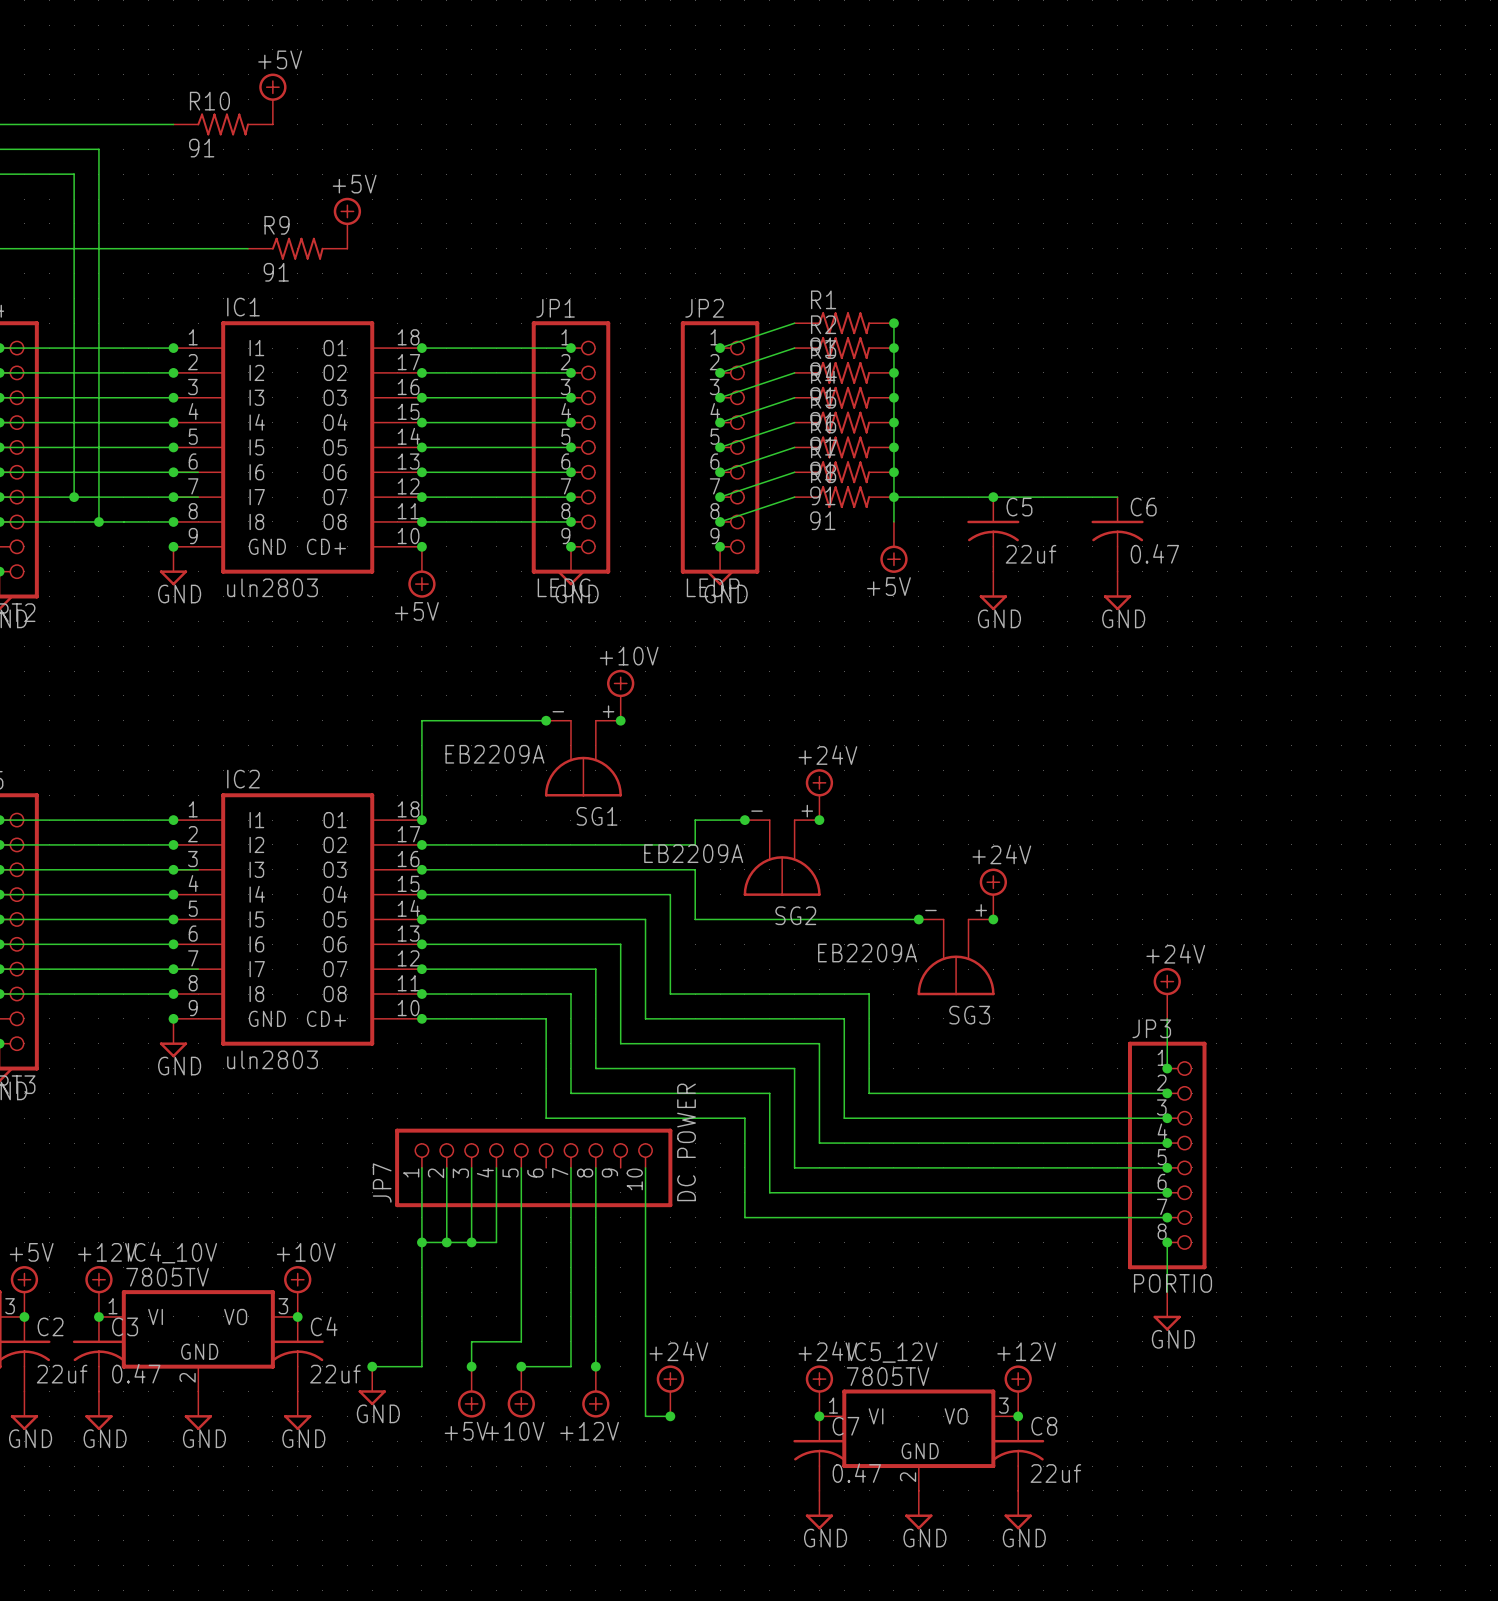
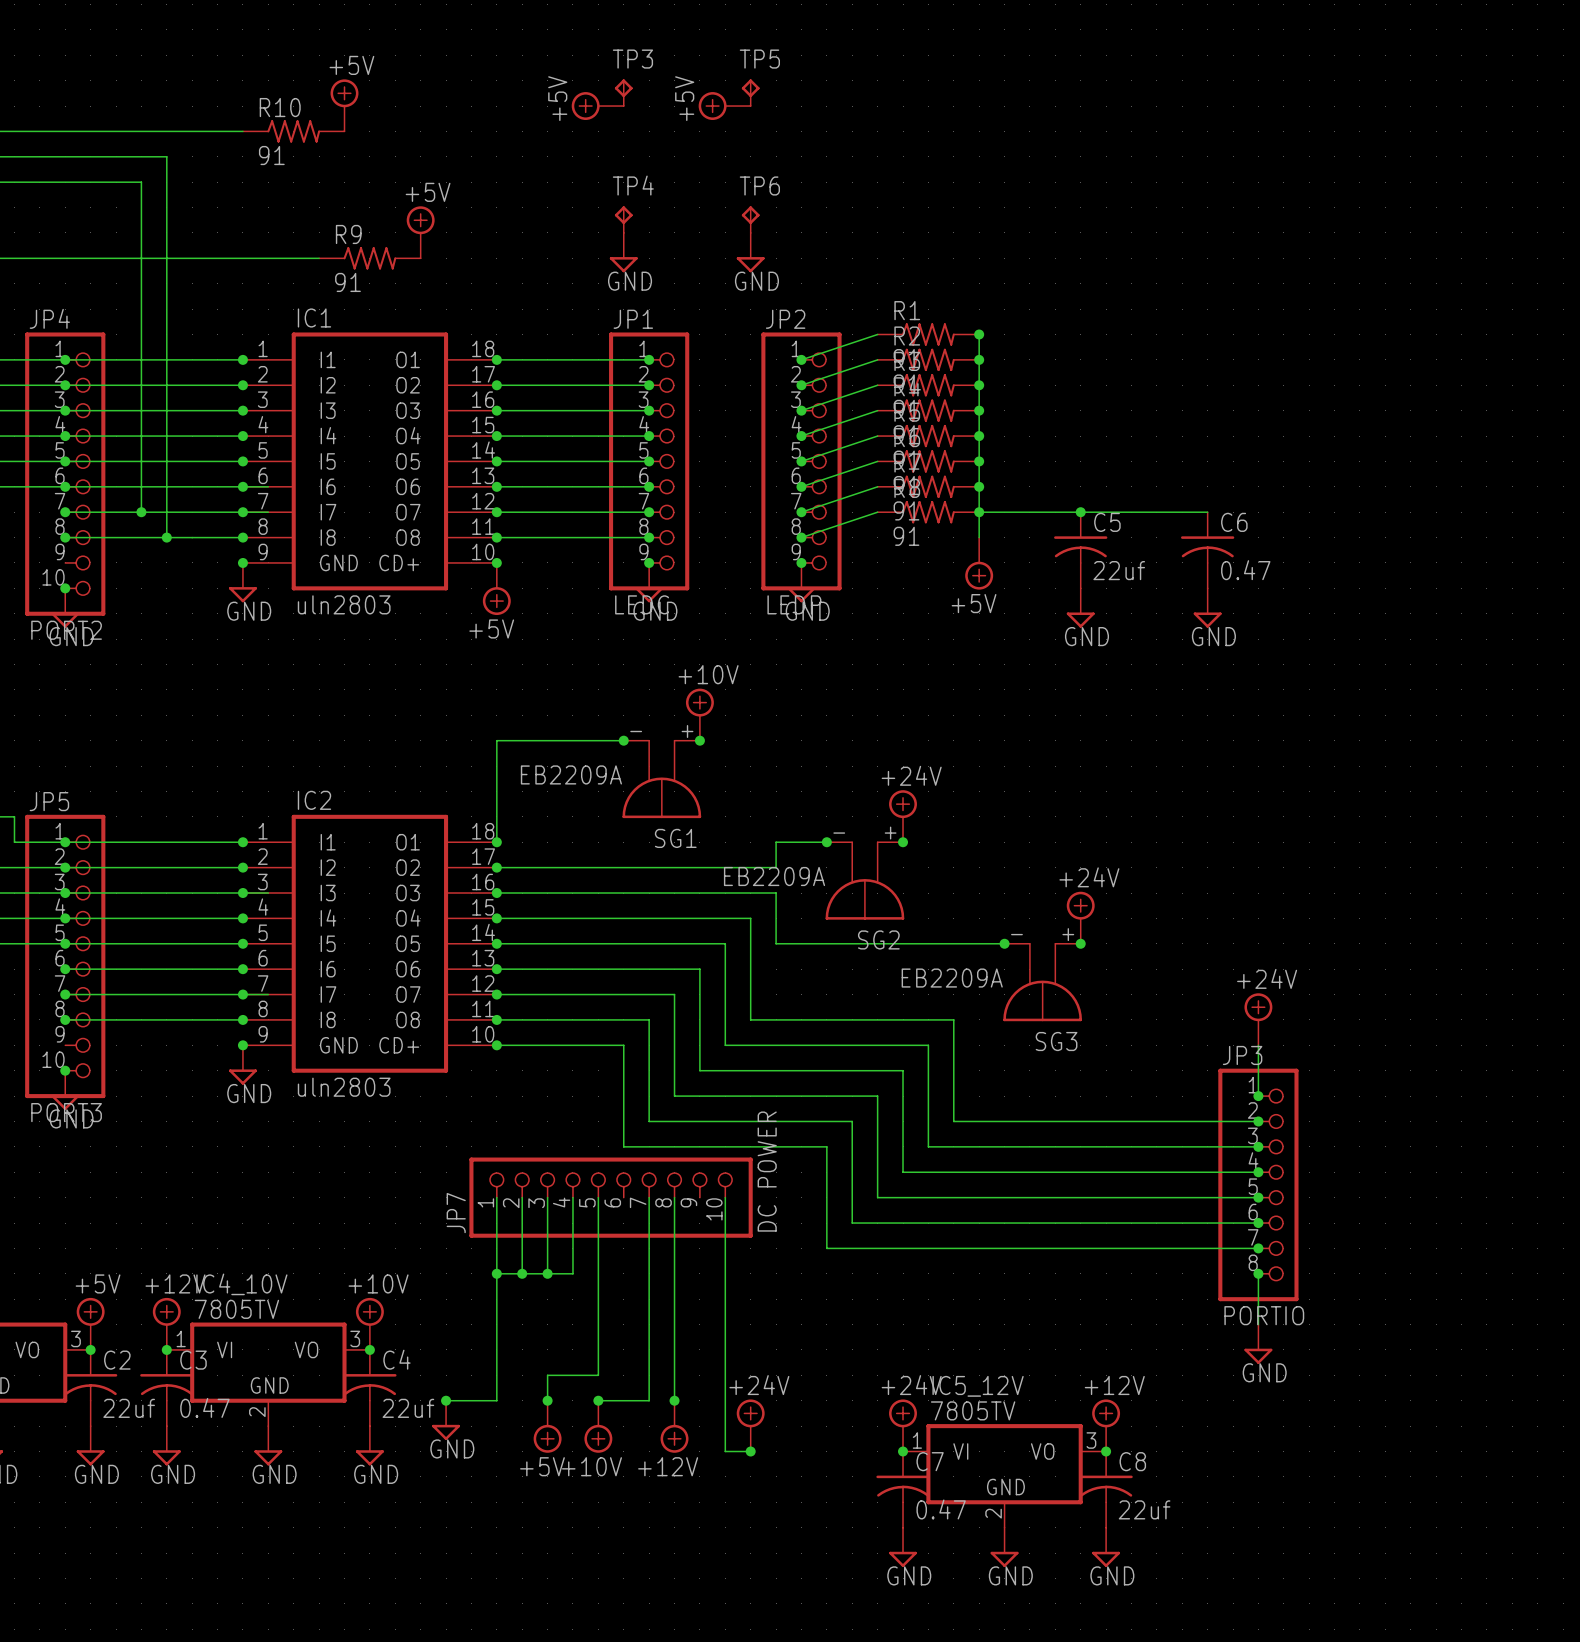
TP3: none -> (623, 92)
TP5: none -> (750, 92)
power symbol: none -> +5V (597, 106)
power symbol: none -> +5V (724, 106)
TP4: none -> (623, 219)
TP6: none -> (750, 219)
power symbol: none -> GND (623, 252)
power symbol: none -> GND (750, 252)

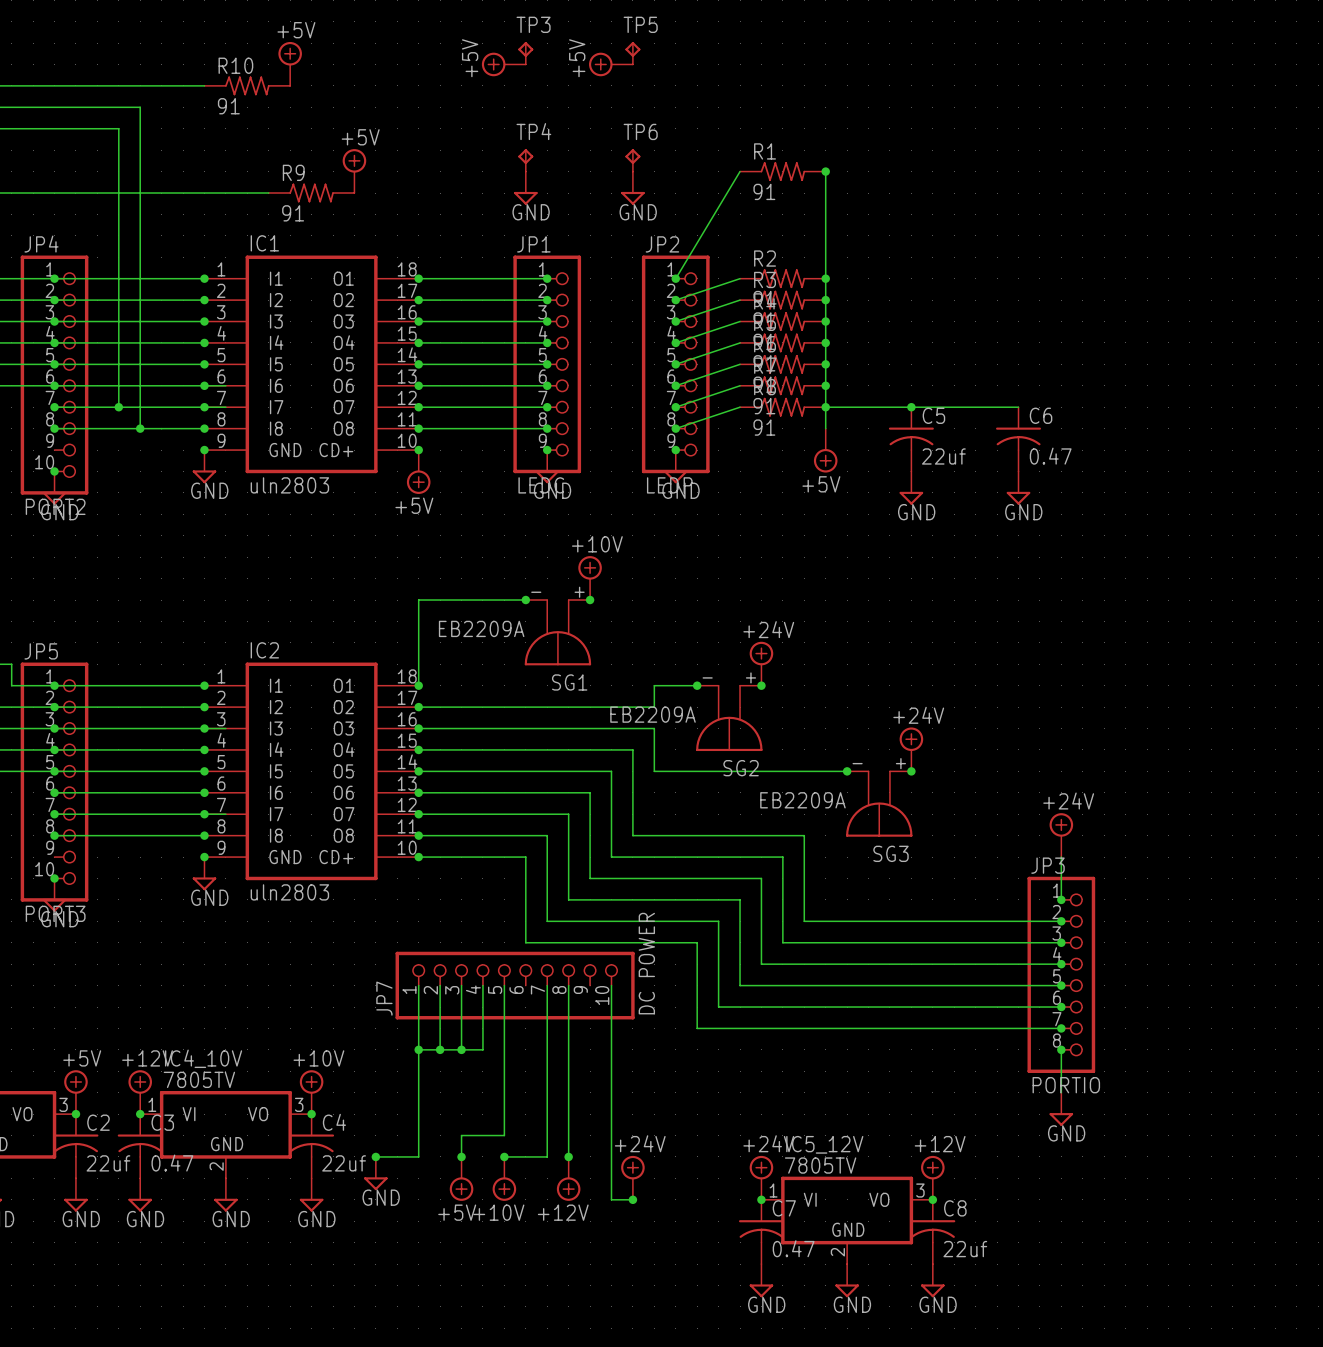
wire: none -> (825, 171) (825, 257)
junction: none -> (825, 171)
wire: (877, 334) (801, 359) -> (740, 171) (675, 278)
R1 position: (928, 334) -> (782, 171)
junction: (979, 334) -> none

